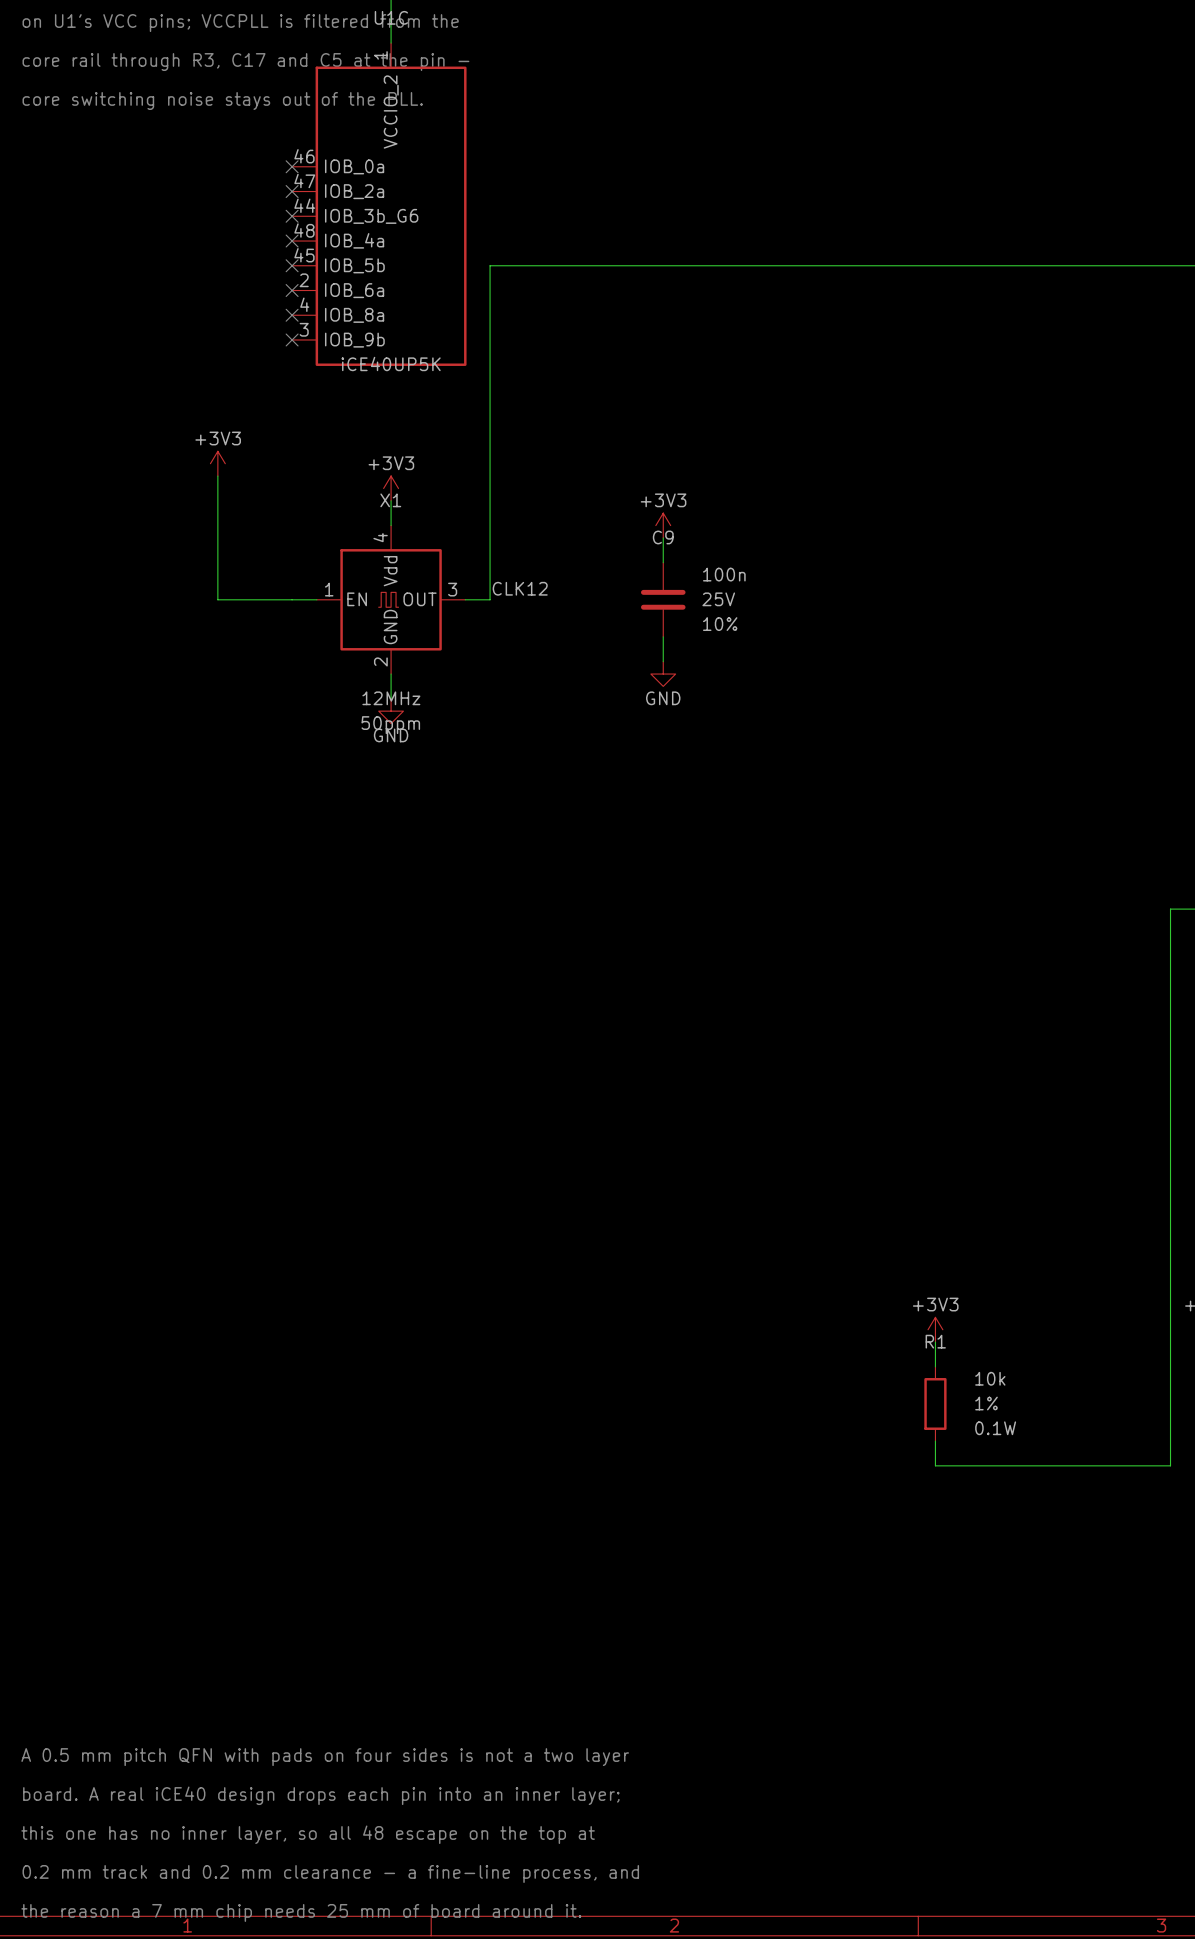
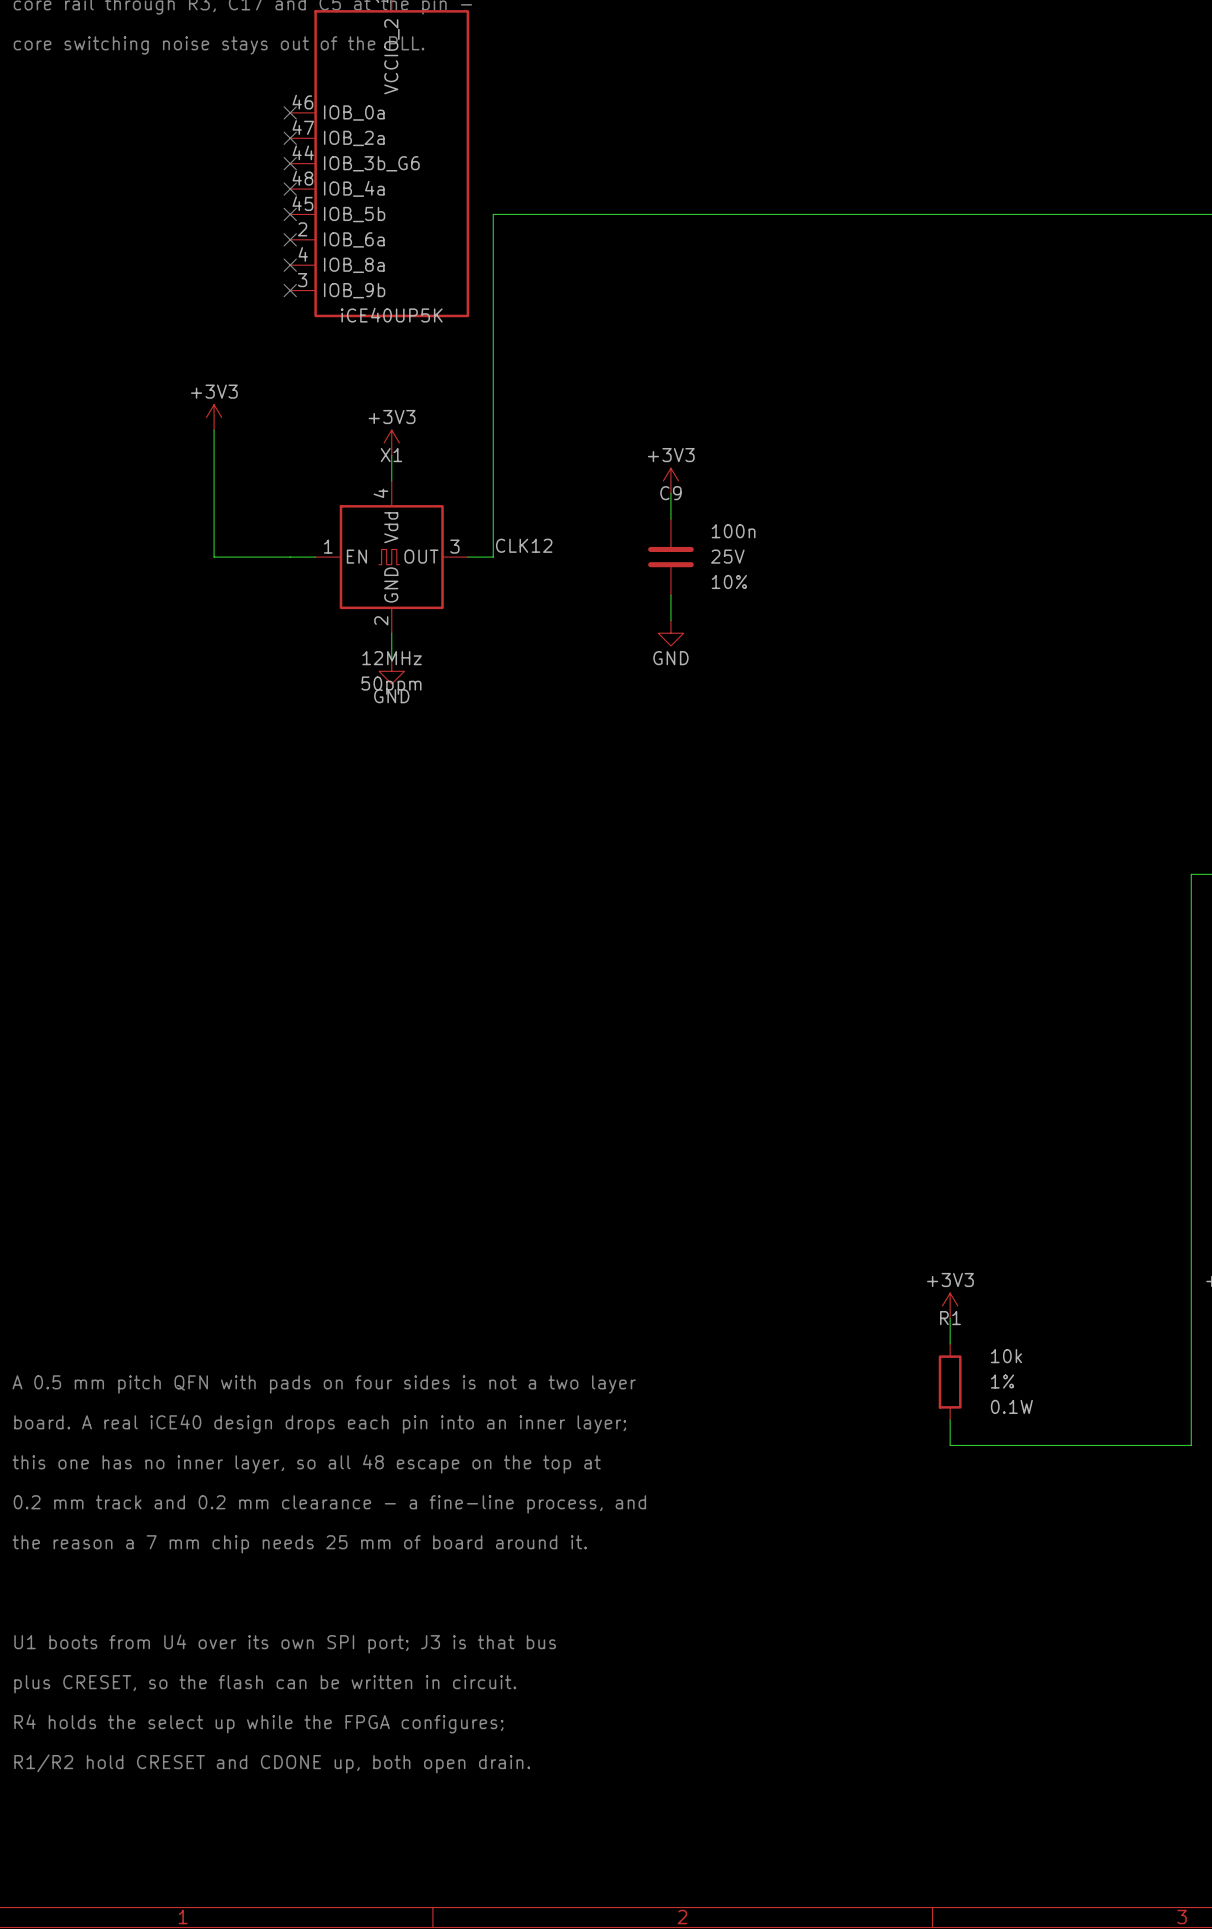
text: none -> A 0.5 mm pitch QFN with pads on four sides is not a two layer (324, 1384)
text: none -> board. A real iCE40 design drops each pin into an inner layer; (320, 1424)
text: none -> this one has no inner layer, so all 48 escape on the top at (306, 1464)
text: none -> 0.2 mm track and 0.2 mm clearance - a fine-line process, and (329, 1504)
text: none -> the reason a 7 mm chip needs 25 mm of board around it. (299, 1544)
text: none -> U1 boots from U4 over its own SPI port; J3 is that bus (285, 1643)
text: none -> plus CRESET, so the flash can be written in circuit. (265, 1684)
text: none -> R4 holds the select up while the FPGA configures; (258, 1723)
text: A 0.5 mm pitch QFN with pads on four sides is not a two layer (325, 1757) -> none
text: none -> R1/R2 hold CRESET and CDONE up, both open drain. (272, 1763)
text: board. A real iCE40 design drops each pin into an inner layer; (321, 1795) -> none
text: this one has no inner layer, so all 48 escape on the top at (308, 1834) -> none
text: 0.2 mm track and 0.2 mm clearance - a fine-line process, and (330, 1874) -> none
text: the reason a 7 mm chip needs 25 mm of board around it. (301, 1912) -> none

